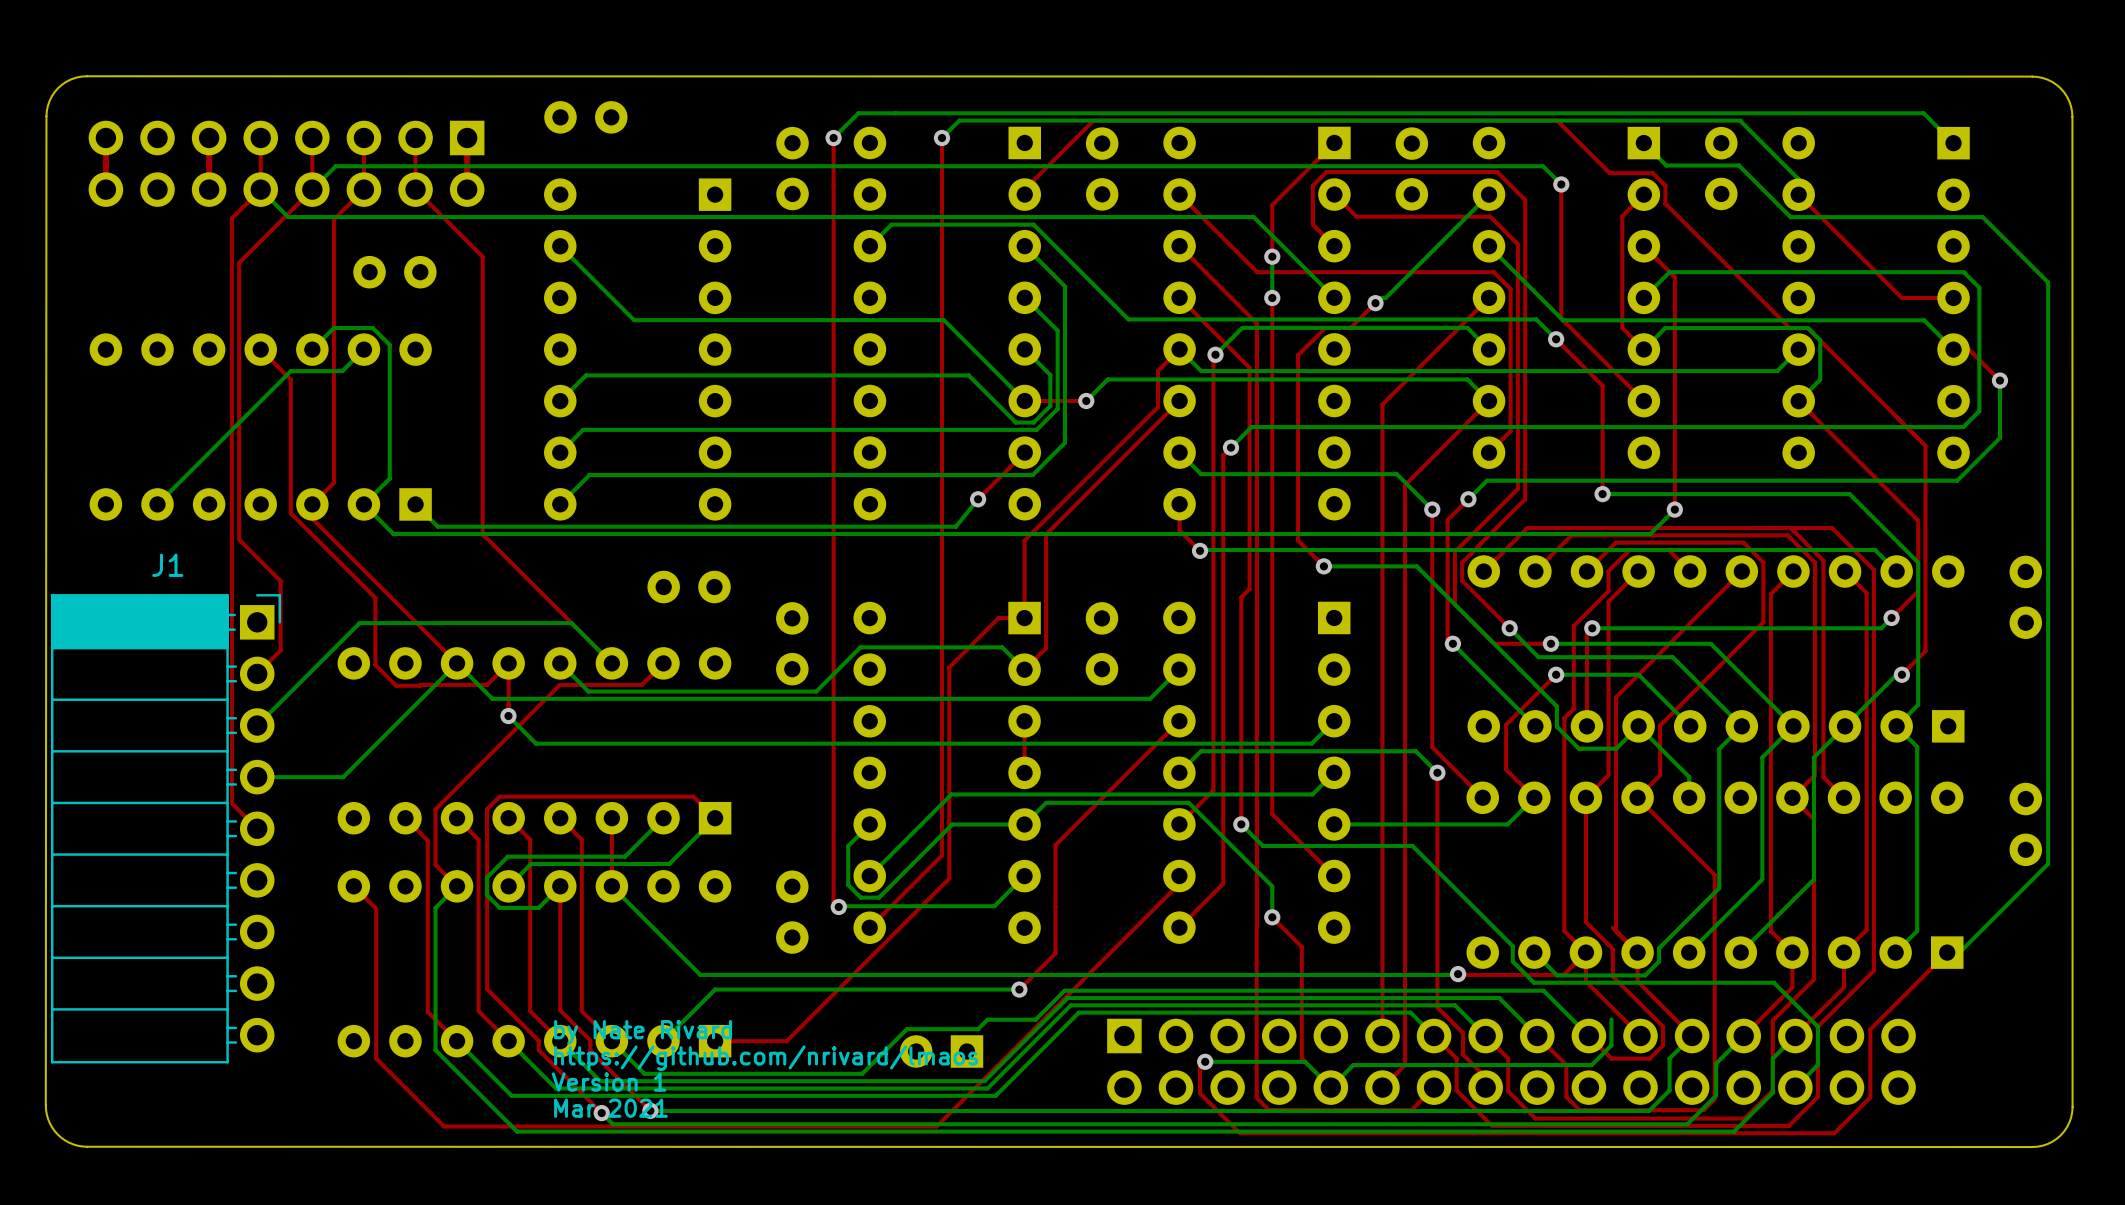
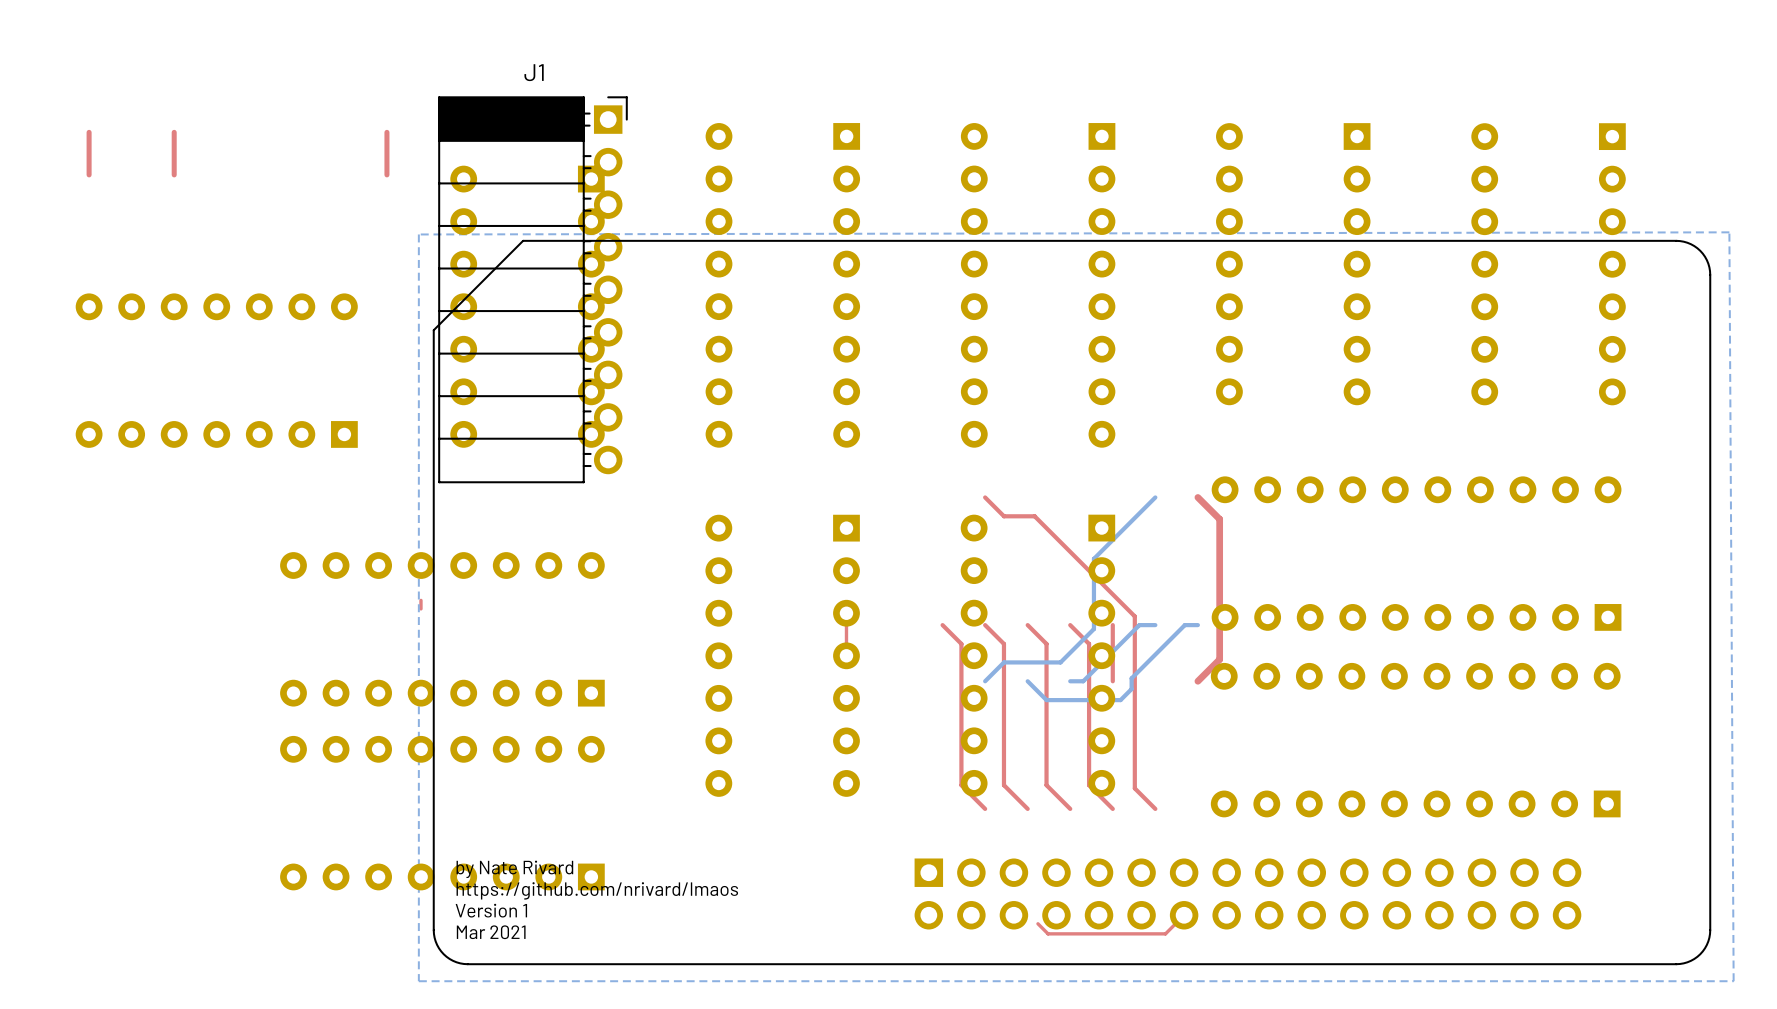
board edge: (86, 76) (2032, 76) (2052, 82) (2067, 96) (2072, 116) (2072, 1106) (2067, 1127) (2052, 1141) (2032, 1147) (87, 1146) (69, 1142) (57, 1134) (52, 1127) (48, 1119) (45, 1105) (46, 116) (49, 100) (58, 87) (71, 79) (86, 76) -> (1676, 240) (1690, 244) (1700, 250) (1706, 260) (1710, 274) (1710, 930) (1706, 944) (1694, 958) (1676, 964) (467, 964) (449, 958) (438, 948) (433, 930) (433, 330) (523, 240) (1676, 240)
part: (585, 117) -> none
top track: (260, 138) (260, 189) (231, 218) (231, 803) (257, 828) -> none
top track: (312, 138) (312, 189) (239, 262) (239, 539) (280, 581) (280, 650) (257, 673) -> none
top track: (363, 138) (363, 189) (333, 219) (333, 482) (312, 504) (312, 518) (457, 663) -> none
top track: (415, 138) (415, 189) (482, 256) (482, 535) (611, 663) -> none
top track: (833, 138) (833, 901) (838, 906) -> none
bottom track: (833, 138) (858, 113) (1923, 113) (1953, 143) -> none
via: (833, 138) -> none
top track: (941, 138) (941, 855) (869, 927) -> none
bottom track: (941, 138) (959, 120) (1740, 120) (1798, 179) (1798, 194) -> none
via: (941, 138) -> none
top track: (1334, 142) (1272, 205) (1272, 256) -> none
bottom track: (1643, 143) (1666, 165) (1738, 165) (1790, 217) (1982, 217) (2048, 282) (2048, 863) (1959, 952) (1947, 952) -> none
part: (286, 163) -> none
part: (792, 168) -> none
part: (1102, 168) -> none
part: (1411, 168) -> none
part: (1721, 168) -> none
top track: (1561, 184) (1561, 318) (1643, 401) -> none
bottom track: (1561, 184) (1543, 166) (335, 166) (312, 189) -> none
via: (1561, 184) -> none
bottom track: (260, 189) (288, 217) (1253, 217) (1334, 297) -> none
top track: (1024, 194) (1024, 189) (1093, 120) (1557, 120) (1609, 173) (1652, 173) (1665, 185) (1665, 203) (1789, 328) (1807, 328) (1925, 445) (1925, 651) (1901, 674) -> none
top track: (1179, 194) (1257, 272) (1493, 272) (1510, 288) (1510, 431) (1489, 452) -> none
top track: (1334, 194) (1356, 216) (1490, 216) (1517, 244) (1517, 488) (1454, 551) (1454, 604) (1494, 643) (1550, 643) -> none
bottom track: (1489, 194) (1385, 297) (1380, 297) (1375, 303) -> none
top track: (1643, 194) (1622, 216) (1622, 327) (1643, 349) -> none
top track: (1798, 194) (1901, 297) (1953, 297) -> none
bottom track: (560, 246) (634, 320) (943, 320) (1024, 401) -> none
bottom track: (869, 246) (891, 224) (1033, 224) (1128, 319) (1536, 319) (1556, 339) -> none
bottom track: (1024, 246) (1064, 286) (1064, 442) (1032, 474) (589, 474) (560, 504) -> none
top track: (1179, 246) (1256, 323) (1256, 927) -> none
top track: (1334, 246) (1312, 224) (1312, 185) (1326, 172) (1497, 172) (1525, 199) (1525, 499) (1478, 545) -> none
bottom track: (1489, 246) (1563, 320) (1924, 320) (1953, 349) -> none
top track: (1643, 246) (1674, 277) (1674, 514) -> none
bottom track: (1272, 256) (1272, 297) -> none
via: (1272, 256) -> none
bottom zone outline: none -> (1729, 232) (1733, 981) (418, 981) (418, 234) (1729, 232)
part: (394, 272) -> none
bottom track: (1024, 297) (1057, 330) (1057, 408) (1036, 429) (583, 429) (560, 452) -> none
top track: (1179, 297) (1249, 367) (1249, 589) (1241, 597) (1241, 824) -> none
top track: (1272, 297) (1272, 814) (1334, 876) -> none
via: (1272, 297) -> none
top track: (1489, 297) (1382, 404) (1382, 1036) -> none
bottom track: (1643, 297) (1669, 272) (1963, 272) (1979, 287) (1979, 411) (1963, 427) (1251, 427) (1230, 447) -> none
top track: (1375, 303) (1350, 327) (1325, 327) (1298, 355) (1298, 540) (1323, 566) -> none
via: (1375, 303) -> none
top track: (1556, 339) (1602, 385) (1602, 494) -> none
via: (1556, 339) -> none
top track: (260, 349) (290, 379) (290, 513) (375, 597) (375, 664) (396, 685) (419, 685) (487, 684) (508, 663) (508, 705) -> none
bottom track: (312, 349) (333, 328) (372, 328) (389, 344) (389, 478) (363, 504) (393, 533) (1650, 533) (1674, 509) -> none
bottom track: (363, 349) (342, 371) (290, 371) (157, 504) -> none
bottom track: (1024, 349) (1050, 375) (1050, 405) (1033, 422) (1015, 422) (968, 375) (585, 375) (560, 401) -> none
top track: (1179, 349) (1158, 370) (1158, 407) (1024, 540) (1024, 618) (998, 618) (949, 667) (949, 878) (786, 1041) (715, 1041) -> none
bottom track: (1179, 349) (1201, 371) (1777, 371) (1798, 349) -> none
bottom track: (1489, 349) (1467, 327) (1242, 327) (1215, 354) -> none
bottom track: (1643, 349) (1665, 328) (1808, 328) (1820, 340) (1820, 379) (1798, 401) -> none
top track: (1953, 349) (1969, 349) (1999, 380) -> none
via: (1215, 354) -> none
top track: (1215, 359) (1213, 362) (1213, 790) (1179, 824) -> none
bottom track: (1999, 380) (1999, 437) (1957, 480) (1486, 480) (1468, 499) -> none
via: (1999, 380) -> none
top track: (1086, 401) (1024, 401) -> none
bottom track: (1086, 401) (1107, 379) (1467, 379) (1489, 401) -> none
via: (1086, 401) -> none
top track: (1179, 401) (1046, 534) (1046, 648) (1024, 669) -> none
top track: (1489, 401) (1405, 485) (1405, 1065) (1382, 1087) -> none
top track: (1798, 401) (1918, 520) (1918, 591) (1891, 617) -> none
top track: (1230, 447) (1223, 455) (1223, 883) (1179, 927) -> none
via: (1230, 447) -> none
top track: (1024, 452) (978, 499) -> none
bottom track: (1179, 452) (1201, 474) (1396, 474) (1432, 509) -> none
bottom track: (1602, 494) (1849, 494) (1918, 562) (1918, 704) (1896, 726) (1917, 746) (1917, 931) (1895, 952) -> none
via: (1602, 494) -> none
bottom track: (978, 499) (955, 526) (437, 526) (415, 504) -> none
via: (978, 499) -> none
top track: (1468, 499) (1447, 520) (1447, 638) (1452, 643) -> none
via: (1468, 499) -> none
top track: (1179, 504) (1179, 530) (1200, 550) -> none
top track: (1432, 509) (1432, 747) (1482, 797) -> none
via: (1432, 509) -> none
via: (1674, 509) -> none
top track: (1790, 528) (1823, 560) (1823, 777) (1844, 797) -> none
top track: (1478, 545) (1462, 562) (1462, 580) (1509, 628) -> none
bottom track: (1200, 550) (1875, 549) (1896, 571) -> none
via: (1200, 550) -> none
bottom track: (1323, 566) (1416, 566) (1556, 706) (1556, 726) (1578, 748) (1616, 748) (1638, 726) (1689, 776) (1689, 797) -> none
via: (1323, 566) -> none
top track: (1483, 571) (1527, 528) (1832, 528) (1873, 569) (1873, 970) (1817, 1026) (1817, 1096) (1788, 1125) (1492, 1125) (1456, 1090) (1456, 1058) (1434, 1036) -> none
top track: (1535, 571) (1571, 535) (1787, 535) (1814, 562) (1814, 775) (1792, 797) (1813, 819) (1813, 979) (1772, 1020) (1772, 1090) (1744, 1118) (1535, 1118) (1508, 1091) (1508, 1058) (1485, 1036) -> none
top track: (1587, 571) (1615, 542) (1743, 542) (1763, 562) (1763, 622) (1660, 725) (1660, 775) (1637, 797) (1714, 874) (1714, 1099) (1703, 1110) (1579, 1110) (1566, 1096) (1566, 1065) (1537, 1036) -> none
top track: (1638, 571) (1608, 601) (1608, 775) (1585, 797) (1585, 922) (1612, 949) (1612, 976) (1663, 1026) (1663, 1045) (1649, 1058) (1611, 1058) (1588, 1036) -> none
top track: (1690, 571) (1668, 549) (1629, 549) (1608, 571) (1608, 591) (1573, 626) (1573, 708) (1564, 718) (1564, 931) (1585, 952) -> none
top track: (1741, 571) (1616, 697) (1616, 931) -> none
top track: (1793, 571) (1770, 594) (1770, 931) (1792, 952) (1792, 987) (1743, 1036) -> none
top track: (1845, 571) (1866, 593) (1866, 930) (1844, 952) (1844, 987) (1795, 1036) -> none
top track: none -> (985, 497) (1003, 516) (1034, 516) (1134, 616) (1134, 788) (1155, 808)
bottom track: none -> (1155, 497) (1093, 558) (1093, 629) (1060, 662) (1003, 662) (985, 681)
top track: none -> (1197, 497) (1219, 519) (1219, 659) (1197, 681)
part: (689, 587) -> none
part: (2025, 597) -> none
bottom track: (1891, 617) (1881, 628) (1592, 628) -> none
via: (1891, 617) -> none
bottom track: (1509, 628) (1538, 657) (1672, 657) (1741, 726) (1719, 748) (1719, 888) (1659, 948) (1659, 961) (1645, 975) (1557, 975) (1534, 952) -> none
via: (1509, 628) -> none
top track: (1592, 628) (1587, 633) (1587, 726) -> none
via: (1592, 628) -> none
part: (792, 643) -> none
part: (1101, 643) -> none
bottom track: (1452, 643) (1535, 726) -> none
via: (1452, 643) -> none
bottom track: (1550, 643) (1710, 643) (1793, 726) (1762, 757) (1762, 879) (1689, 952) -> none
via: (1550, 643) -> none
bottom track: (560, 663) (588, 691) (816, 691) (860, 647) (1002, 647) (1024, 669) -> none
bottom track: (611, 663) (571, 623) (359, 623) (257, 725) -> none
top track: (663, 663) (641, 684) (559, 684) (435, 809) (435, 864) (457, 886) -> none
bottom track: (1179, 669) (1150, 698) (492, 698) (457, 663) (343, 777) (257, 777) -> none
top track: (1556, 674) (1506, 724) (1506, 769) (1534, 797) -> none
bottom track: (1556, 674) (1638, 674) (1690, 726) -> none
via: (1556, 674) -> none
bottom track: (1901, 674) (1896, 674) (1813, 757) (1813, 879) (1740, 952) -> none
via: (1901, 674) -> none
bottom track: (508, 716) (536, 743) (1311, 743) (1334, 721) -> none
via: (508, 716) -> none
top track: (1179, 721) (1055, 845) (1055, 953) (1019, 989) -> none
top track: none -> (942, 625) (961, 643) (961, 785) (985, 808)
top track: none -> (985, 625) (1003, 643) (1003, 785) (1027, 808)
top track: none -> (1027, 625) (1046, 643) (1046, 785) (1070, 808)
top track: none -> (1070, 625) (1089, 643) (1089, 785) (1112, 808)
top track: none -> (1112, 625) (1112, 681)
bottom track: none -> (1155, 625) (1139, 625) (1083, 681) (1070, 681)
bottom track: none -> (1197, 625) (1184, 625) (1131, 678) (1131, 689) (1120, 700) (1046, 700) (1027, 681)
bottom track: (1334, 772) (1312, 794) (951, 794) (869, 876) -> none
top track: (1437, 772) (1437, 1007) (1463, 1033) (1463, 1054) (1485, 1077) (1485, 1087) -> none
bottom track: (1437, 772) (1415, 751) (1200, 751) (1179, 772) -> none
via: (1437, 772) -> none
bottom track: (1534, 797) (1507, 824) (1334, 824) -> none
top track: (405, 818) (427, 840) (427, 1011) (457, 1041) -> none
top track: (457, 818) (478, 839) (478, 1011) (508, 1041) -> none
top track: (508, 818) (530, 839) (530, 1011) (560, 1041) -> none
top track: (560, 818) (581, 839) (581, 1011) (611, 1041) -> none
top track: (611, 818) (611, 886) -> none
bottom track: (663, 818) (625, 856) (507, 856) (487, 877) (487, 895) (499, 907) (538, 907) (560, 886) -> none
top track: (715, 818) (693, 796) (499, 796) (487, 809) (487, 989) (538, 1040) (538, 1050) (601, 1113) -> none
bottom track: (715, 818) (669, 863) (531, 863) (508, 886) -> none
bottom track: (869, 824) (848, 846) (848, 885) (860, 897) (879, 897) (952, 824) (1024, 824) (1046, 802) (1188, 802) (1272, 886) (1272, 917) -> none
bottom track: (1241, 824) (1262, 845) (1412, 845) (1512, 946) (1512, 961) (1534, 982) (1773, 982) (1817, 1026) (1817, 1065) (1795, 1087) -> none
via: (1241, 824) -> none
part: (2025, 824) -> none
J1 position: (166, 828) -> (532, 289)
bottom track: (1024, 876) (994, 906) (838, 906) -> none
top track: (1179, 876) (1179, 883) (936, 1126) (444, 1126) (376, 1058) (376, 908) (353, 886) -> none
bottom track: (457, 886) (435, 907) (435, 1050) (516, 1131) (1734, 1131) (1772, 1092) (1772, 1058) (1795, 1036) -> none
top track: (560, 886) (560, 1010) (590, 1040) (590, 1050) (650, 1110) -> none
bottom track: (611, 886) (700, 974) (1458, 974) -> none
via: (838, 906) -> none
part: (792, 912) -> none
top track: (1272, 917) (1301, 946) (1301, 1058) (1330, 1087) -> none
via: (1272, 917) -> none
top track: (1256, 927) (1256, 1096) -> none
top track: (1612, 927) (1637, 952) (1637, 981) (1692, 1036) -> none
top track: (1585, 952) (1563, 974) (1458, 974) -> none
top track: (1585, 952) (1585, 981) (1640, 1036) -> none
top track: (1947, 952) (1870, 1029) (1870, 1097) (1834, 1133) (1239, 1133) (1200, 1093) (1200, 1066) (1205, 1061) -> none
via: (1458, 974) -> none
bottom track: (1019, 989) (715, 989) (663, 1041) -> none
via: (1019, 989) -> none
bottom track: (1611, 1019) (1611, 1045) (1591, 1065) (1353, 1065) (1330, 1087) (1305, 1061) (1205, 1061) -> none
bottom track: (1434, 1036) (1410, 1012) (1078, 1012) (995, 1095) (511, 1095) (457, 1041) -> none
bottom track: (1485, 1036) (1455, 1005) (1070, 1005) (987, 1088) (555, 1088) (508, 1041) -> none
bottom track: (1537, 1036) (1499, 998) (1067, 998) (984, 1081) (600, 1081) (560, 1041) -> none
bottom track: (1588, 1036) (1543, 990) (1064, 990) (1035, 1019) (987, 1019) (978, 1029) (906, 1029) (862, 1073) (644, 1073) (611, 1041) -> none
bottom track: (1692, 1036) (1669, 1058) (1669, 1090) (1649, 1110) (650, 1110) -> none
bottom track: (1743, 1036) (1716, 1063) (1716, 1095) (1687, 1124) (612, 1124) (601, 1113) -> none
part: (941, 1051) -> none
via: (1205, 1061) -> none
via: (650, 1110) -> none
via: (601, 1113) -> none

